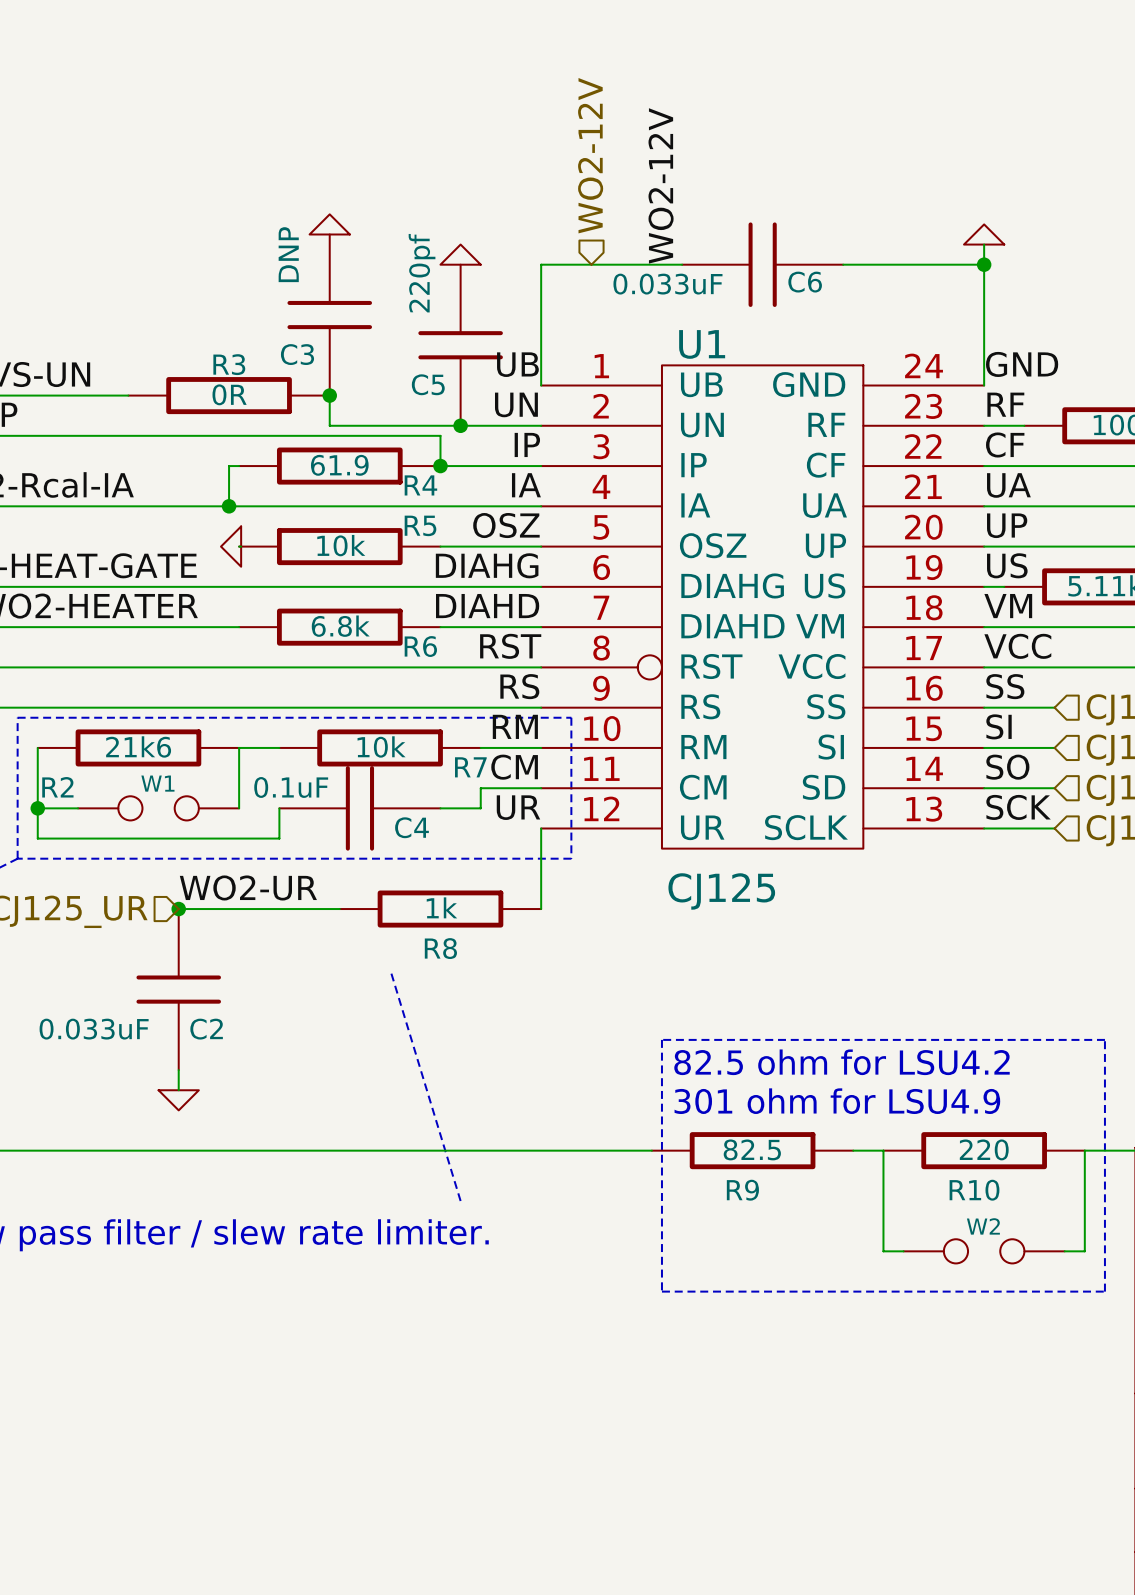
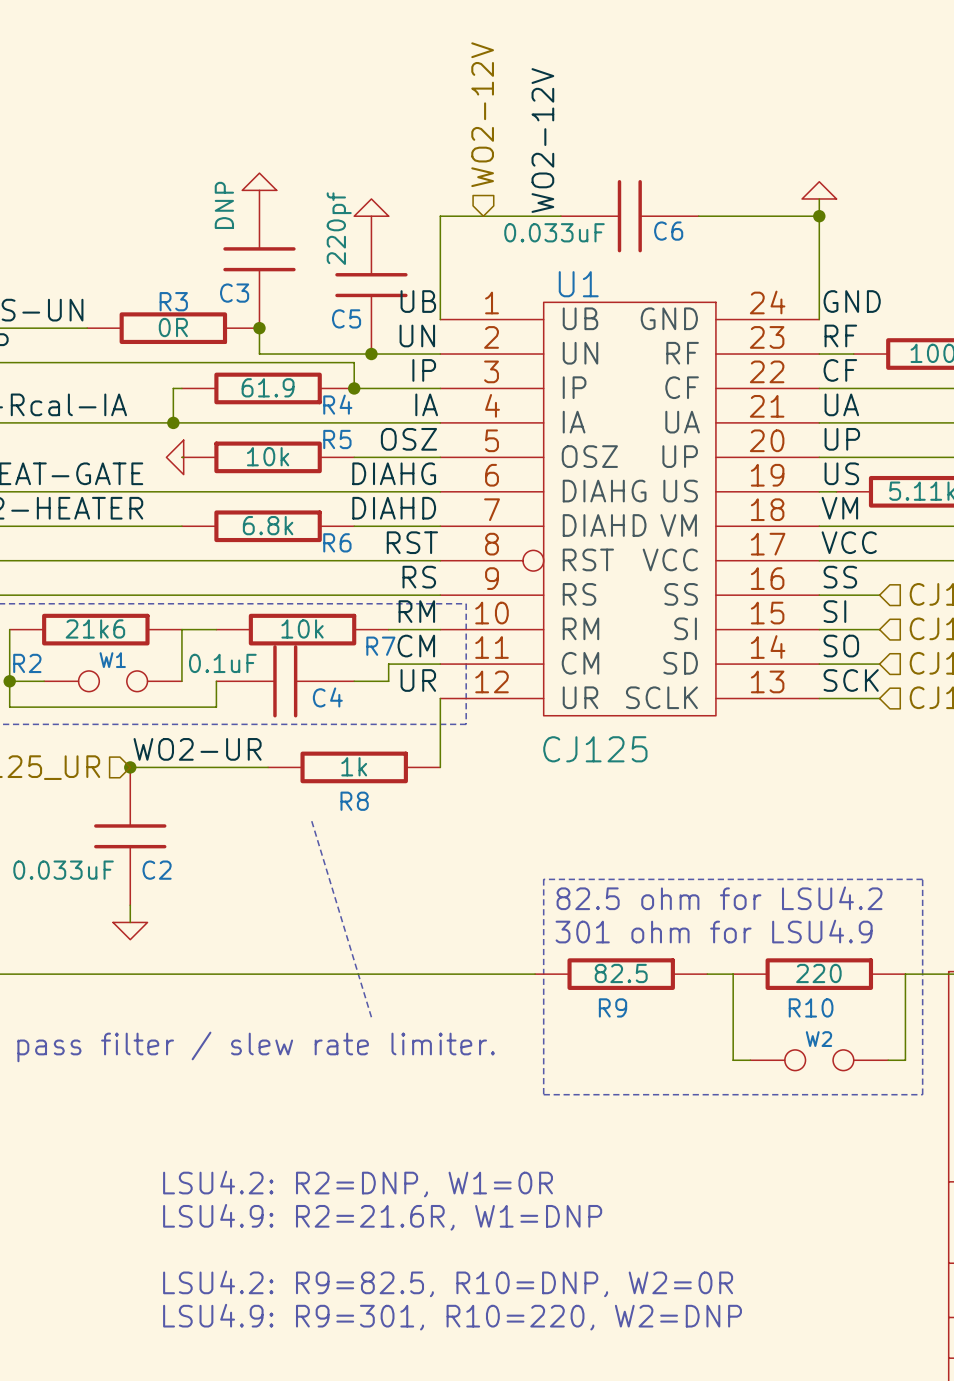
text: none -> LSU4.2: R2=DNP, W1=0R (358, 1184)
text: none -> LSU4.9: R2=21.6R, W1=DNP (382, 1217)
text: none -> LSU4.2: R9=82.5, R10=DNP, W2=0R (448, 1283)
text: none -> LSU4.9: R9=301, R10=220, W2=DNP (452, 1317)

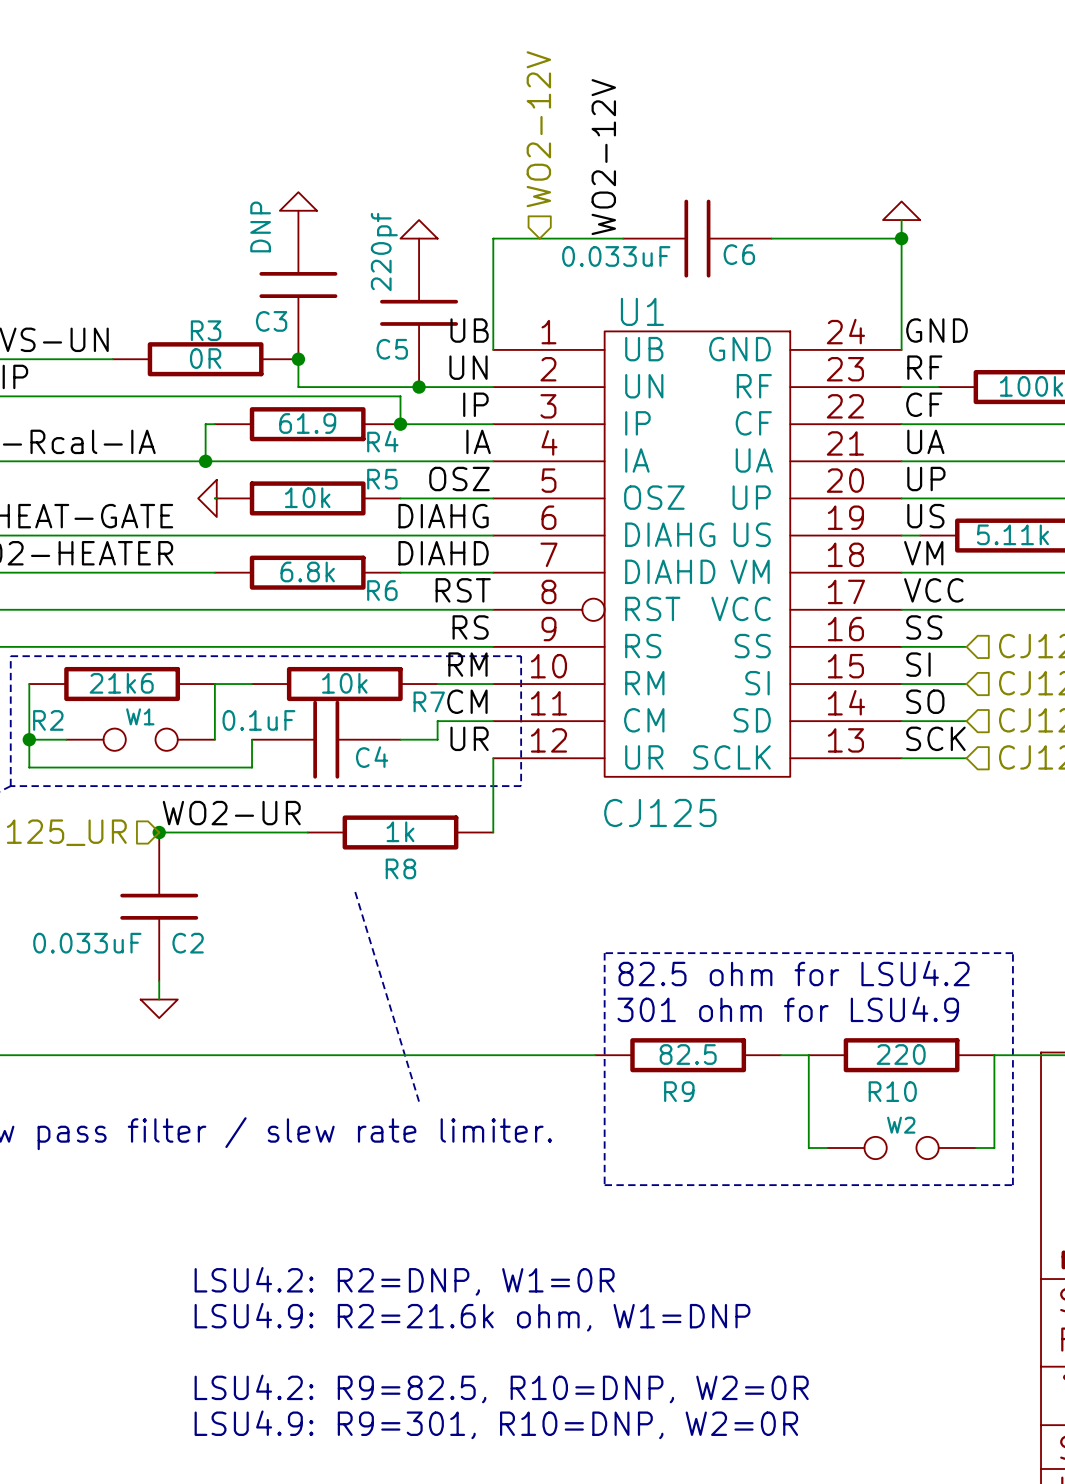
text: LSU4.9: R2=21.6R, W1=DNP (382, 1217) -> LSU4.9: R2=21.6k ohm, W1=DNP (472, 1317)
text: LSU4.9: R9=301, R10=220, W2=DNP (452, 1317) -> LSU4.9: R9=301, R10=DNP, W2=0R (496, 1424)

